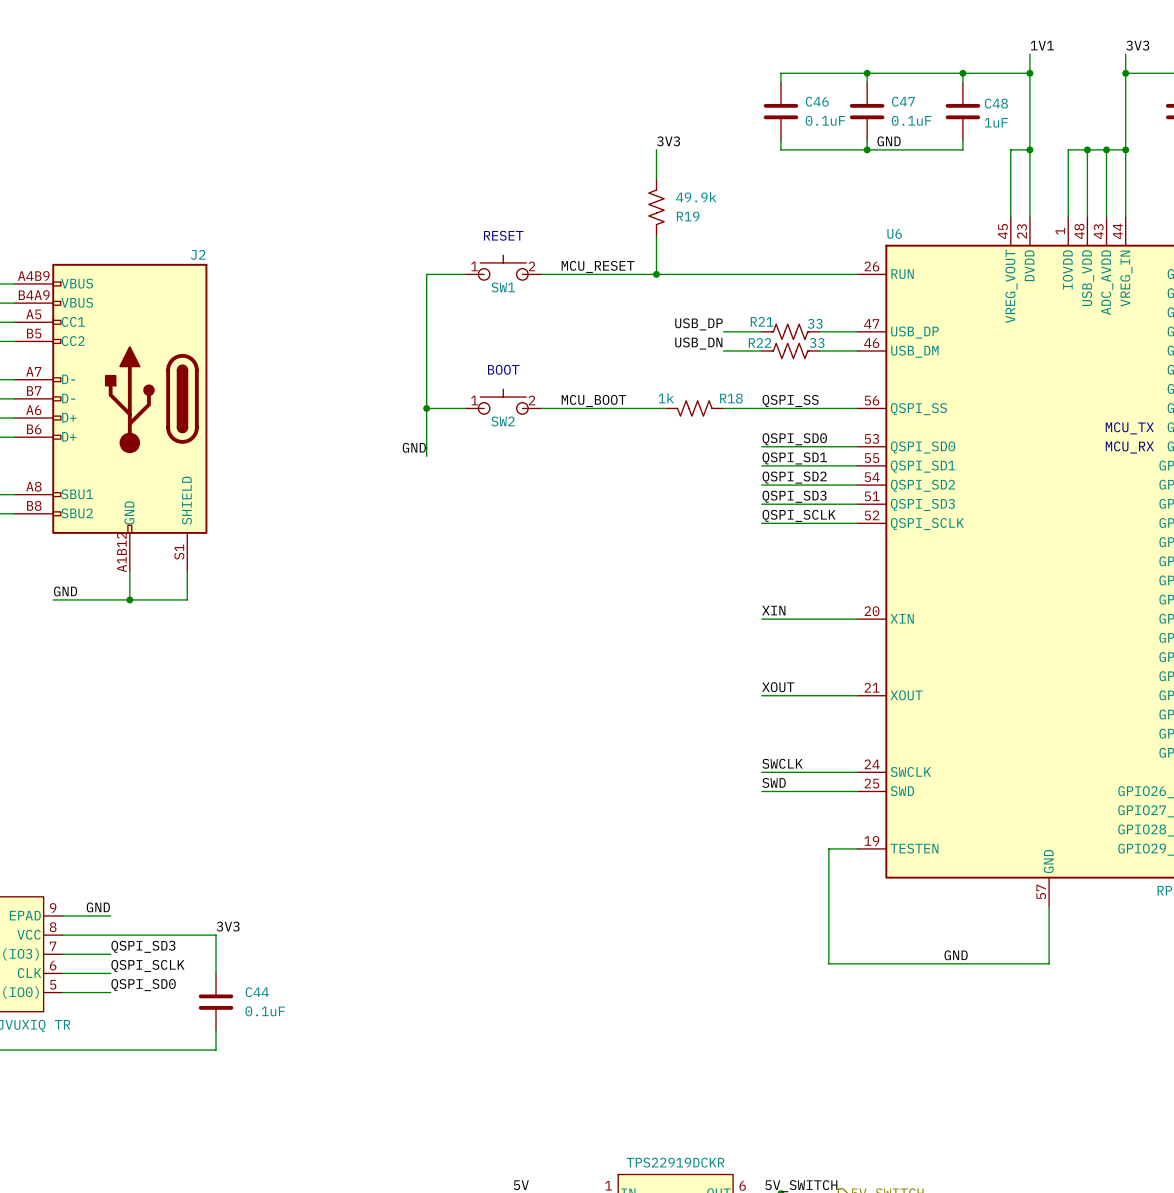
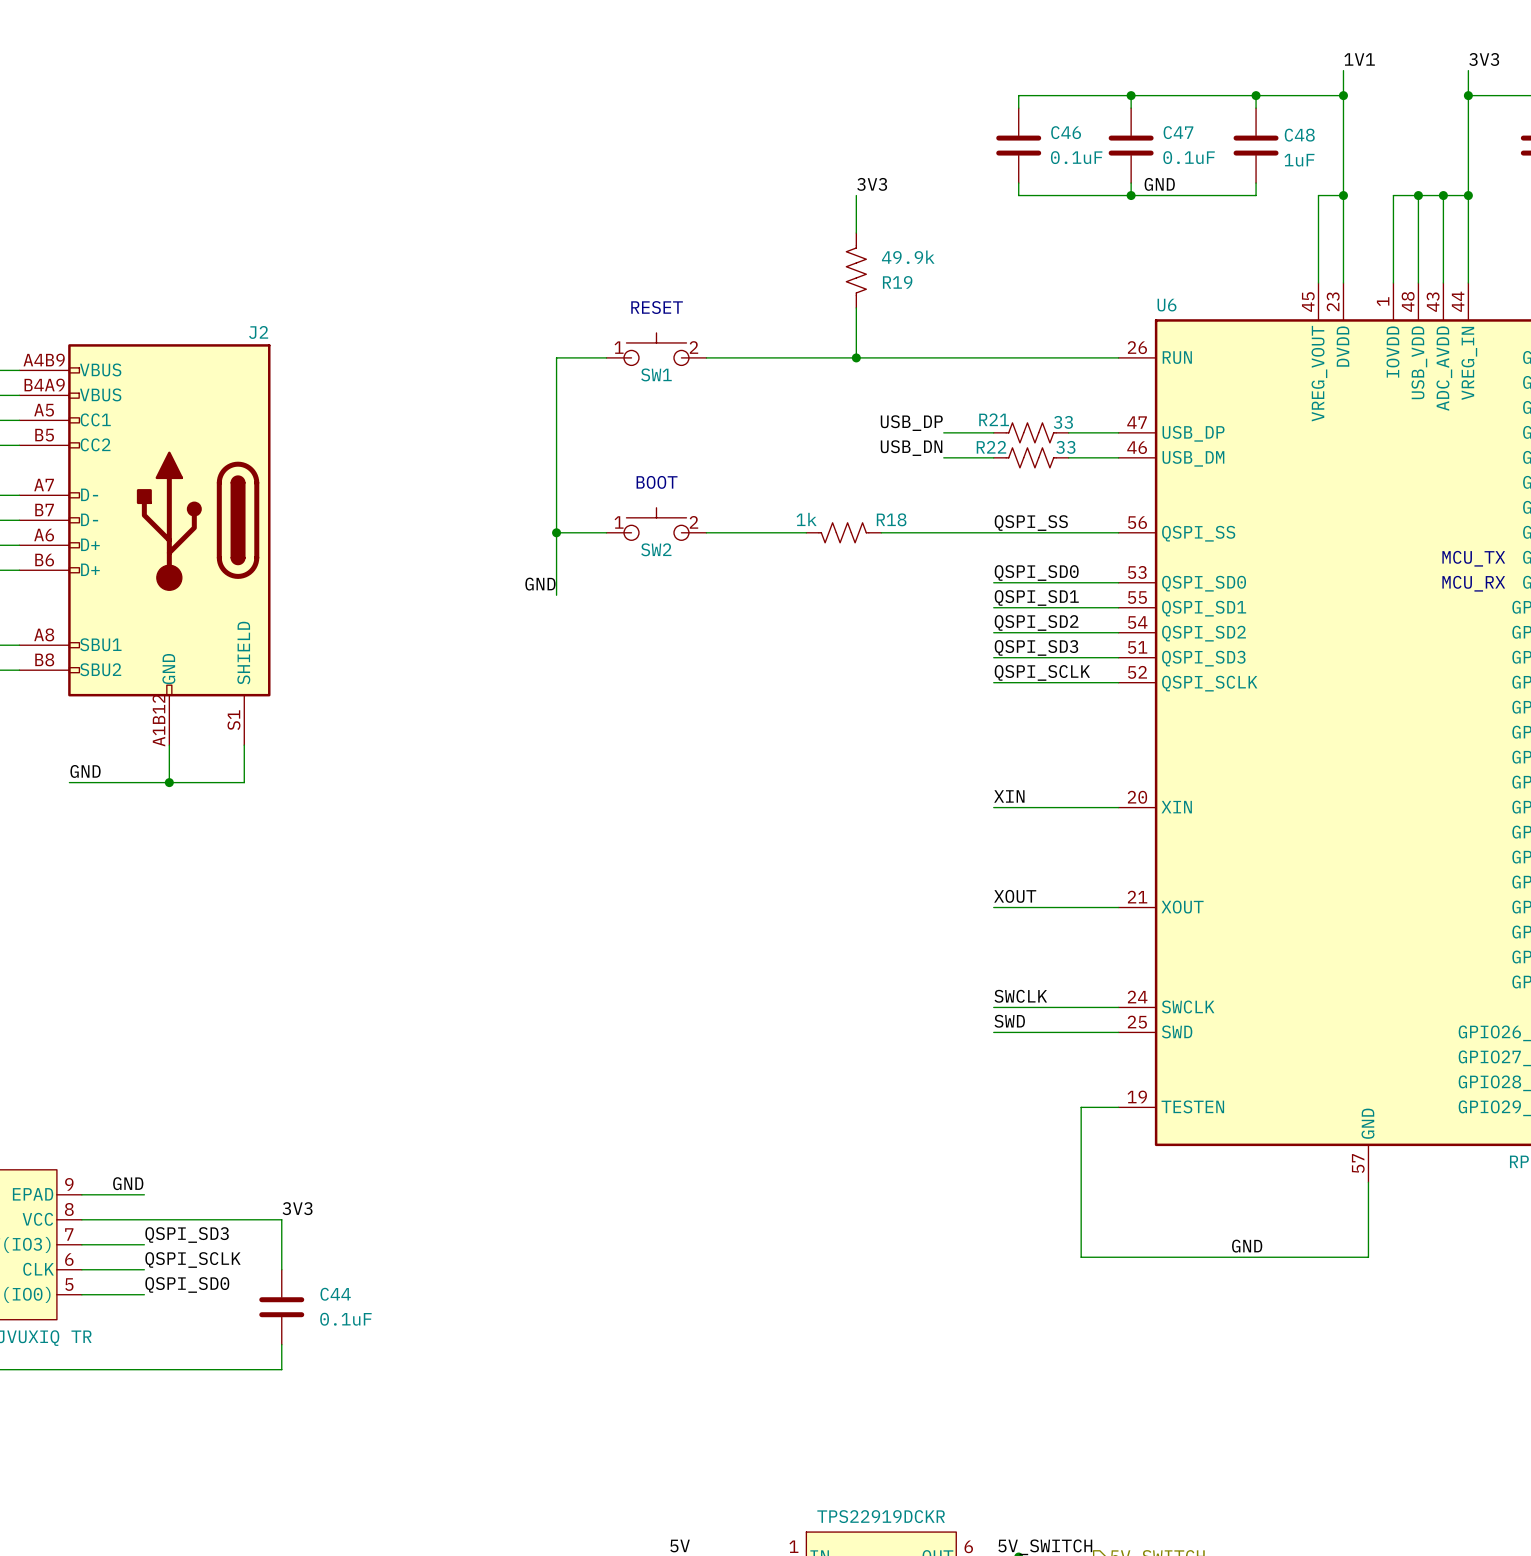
label: MCU_RESET (598, 266) -> none
label: MCU_BOOT (593, 400) -> none
wire: (618, 408) (666, 408) -> (881, 532) (943, 532)
R18 position: (694, 408) -> (843, 532)

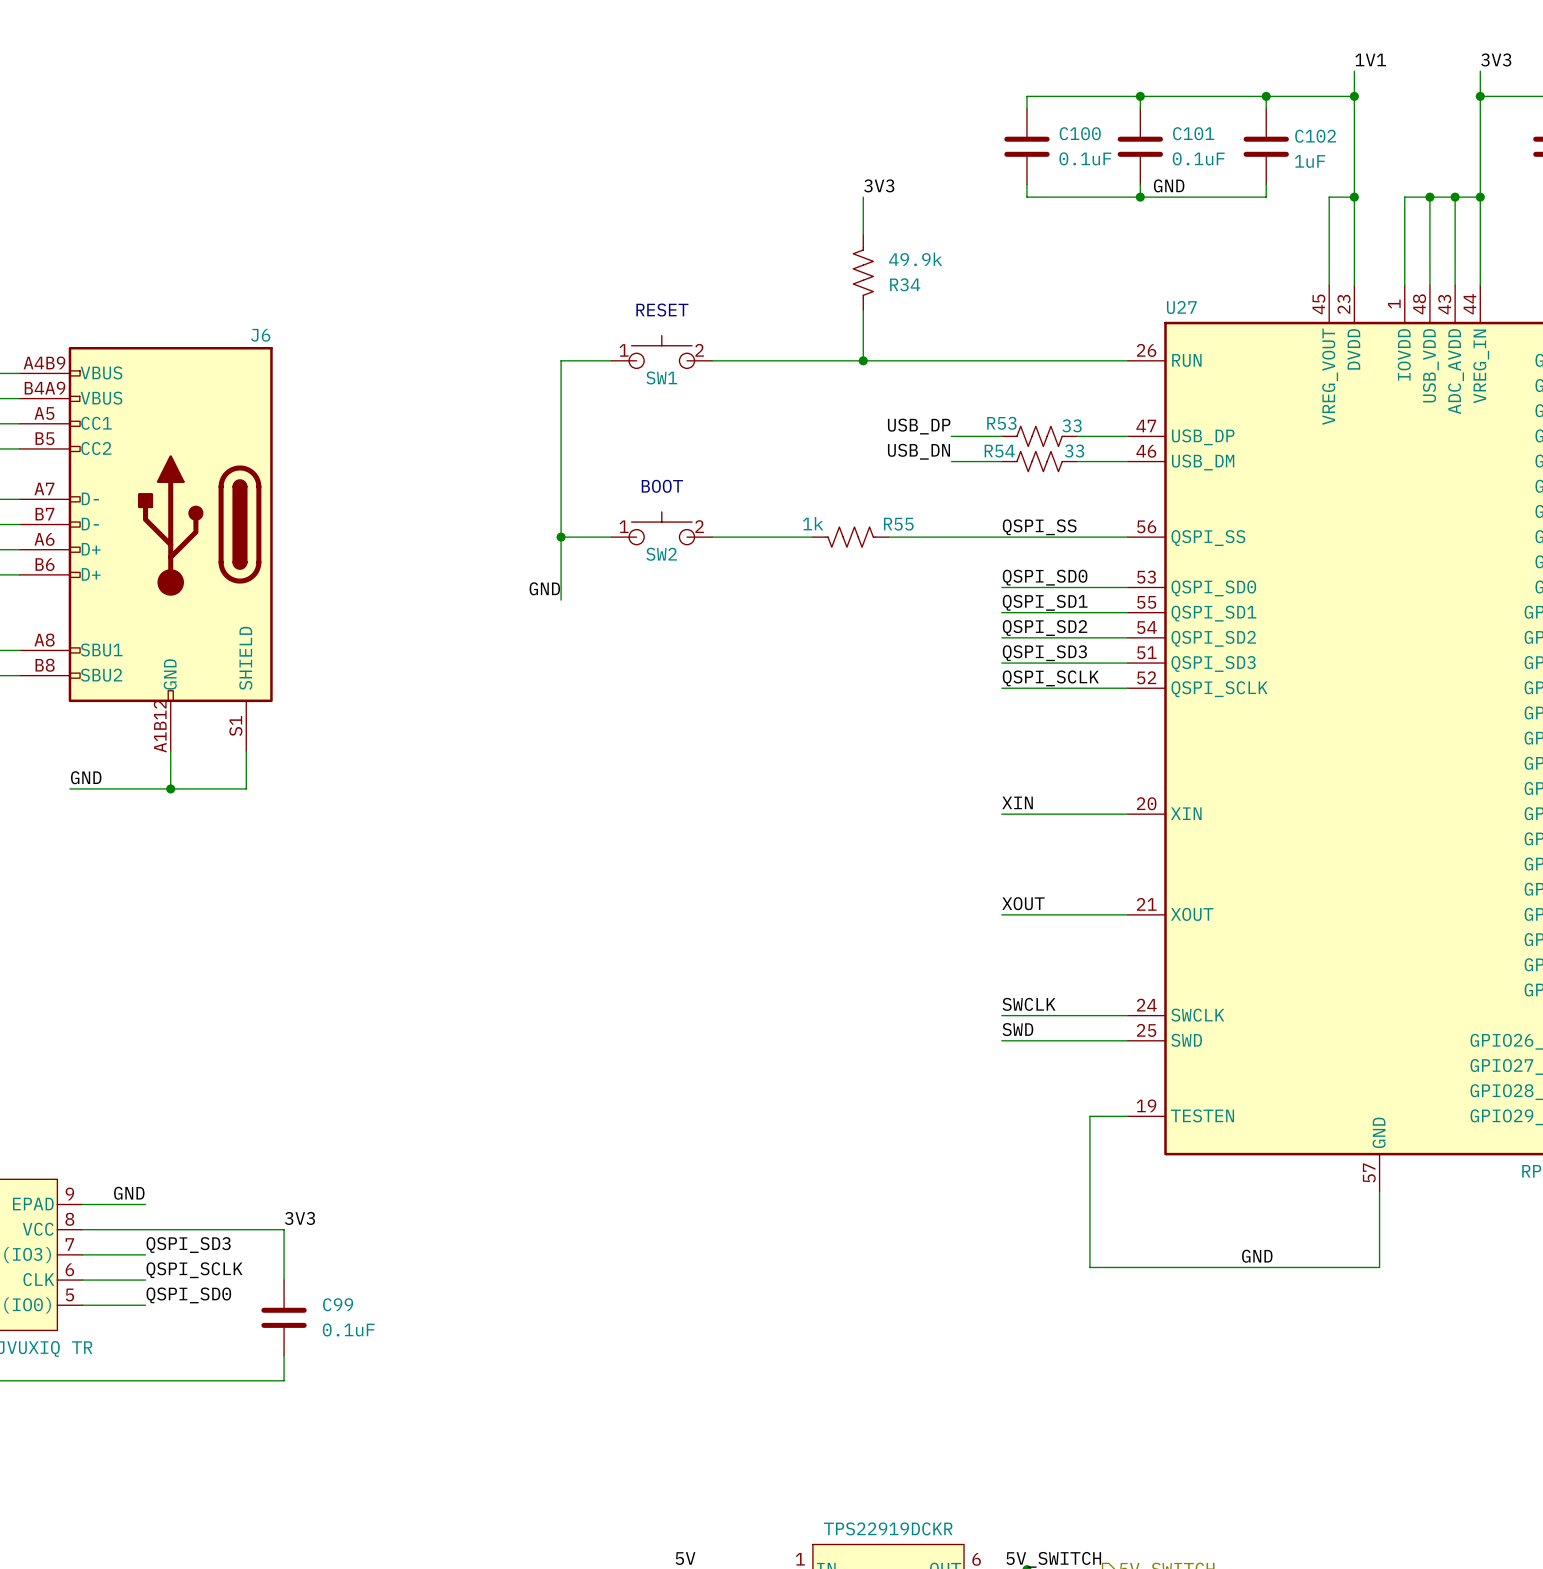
C46 name: C46 (1066, 132) -> C100 (1080, 133)
C47 name: C47 (1178, 132) -> C101 (1193, 133)
C48 name: C48 (1299, 135) -> C102 (1315, 136)
R19 name: R19 (897, 282) -> R34 (905, 284)
U6 name: U6 (1166, 305) -> U27 (1181, 307)
J2 name: J2 (258, 332) -> J6 (260, 335)
R21 name: R21 (994, 419) -> R53 (1001, 423)
R22 name: R22 (991, 447) -> R54 (999, 451)
R18 name: R18 (891, 519) -> R55 (898, 524)
text: MCU_TX (1473, 558) -> none
text: MCU_RX (1473, 583) -> none
C44 name: C44 (335, 1294) -> C99 (338, 1304)

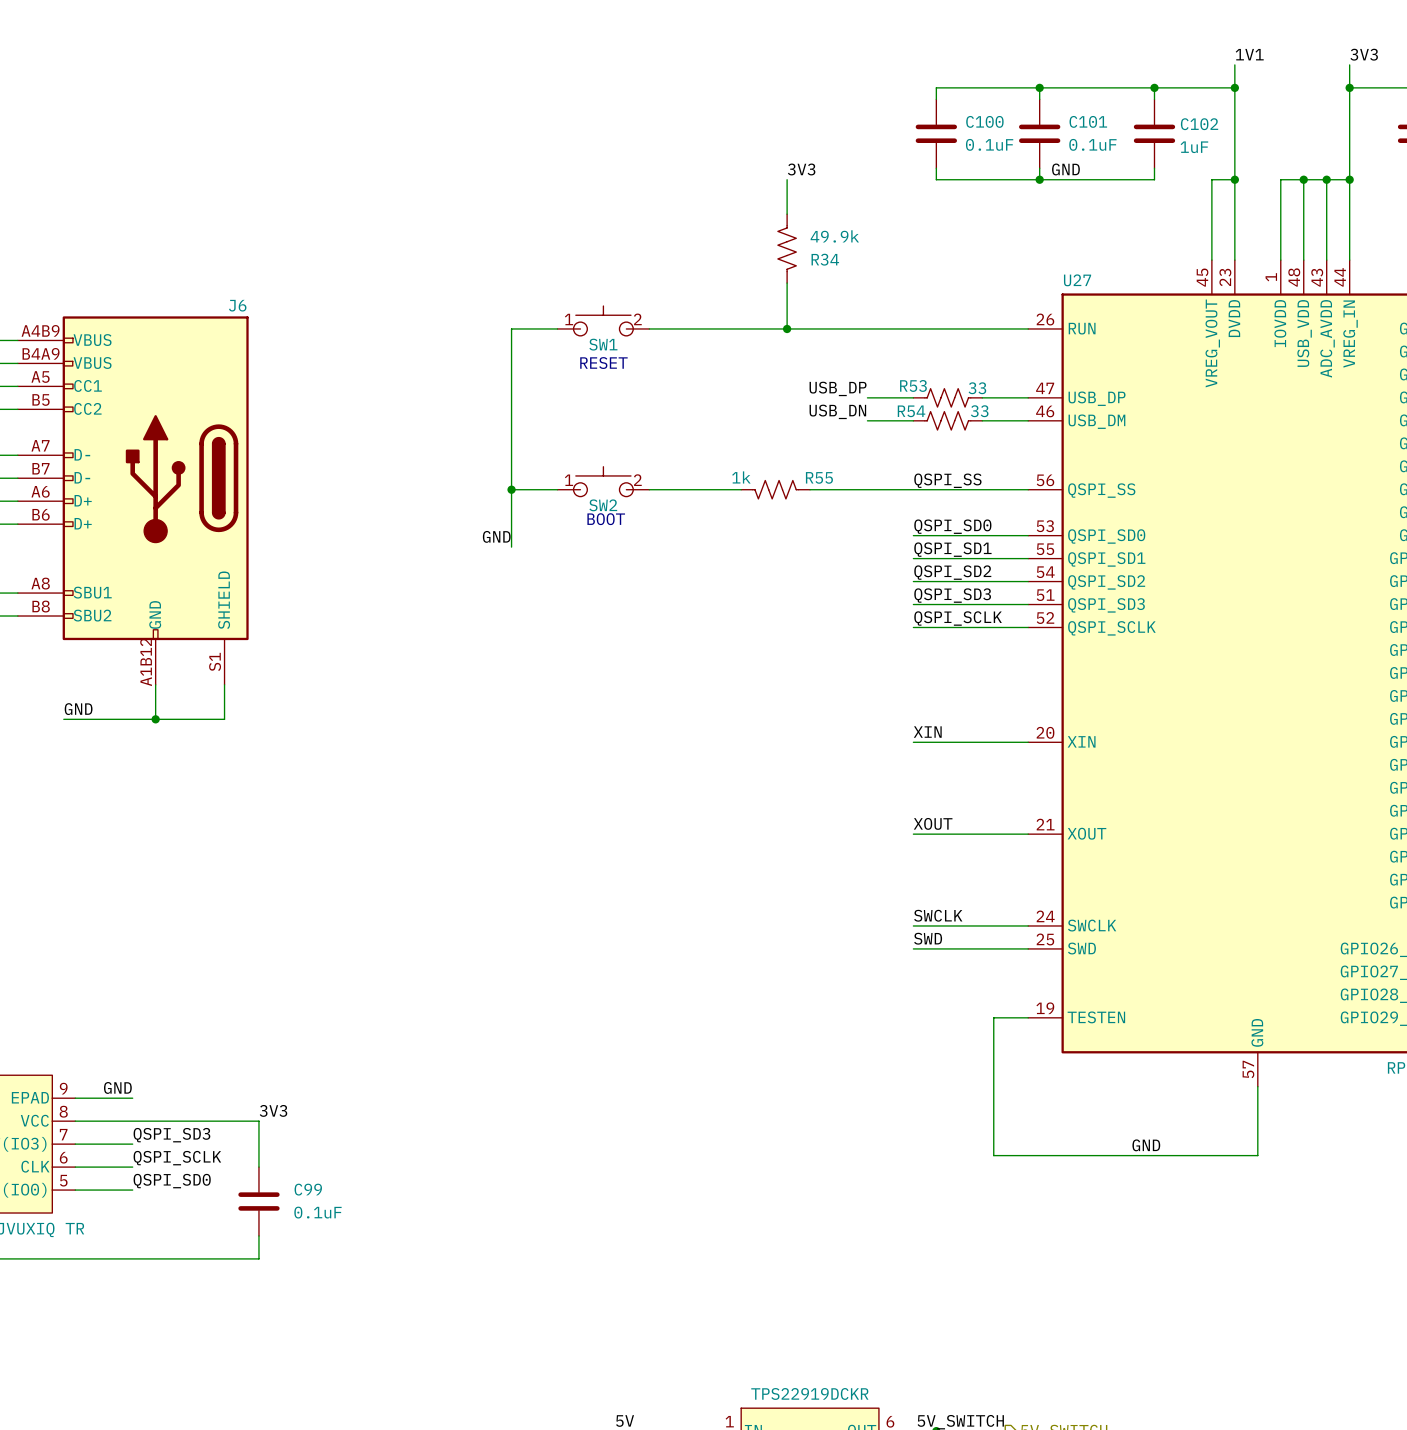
text position: RESET (662, 310) -> RESET (603, 363)
text position: BOOT (662, 486) -> BOOT (606, 519)

